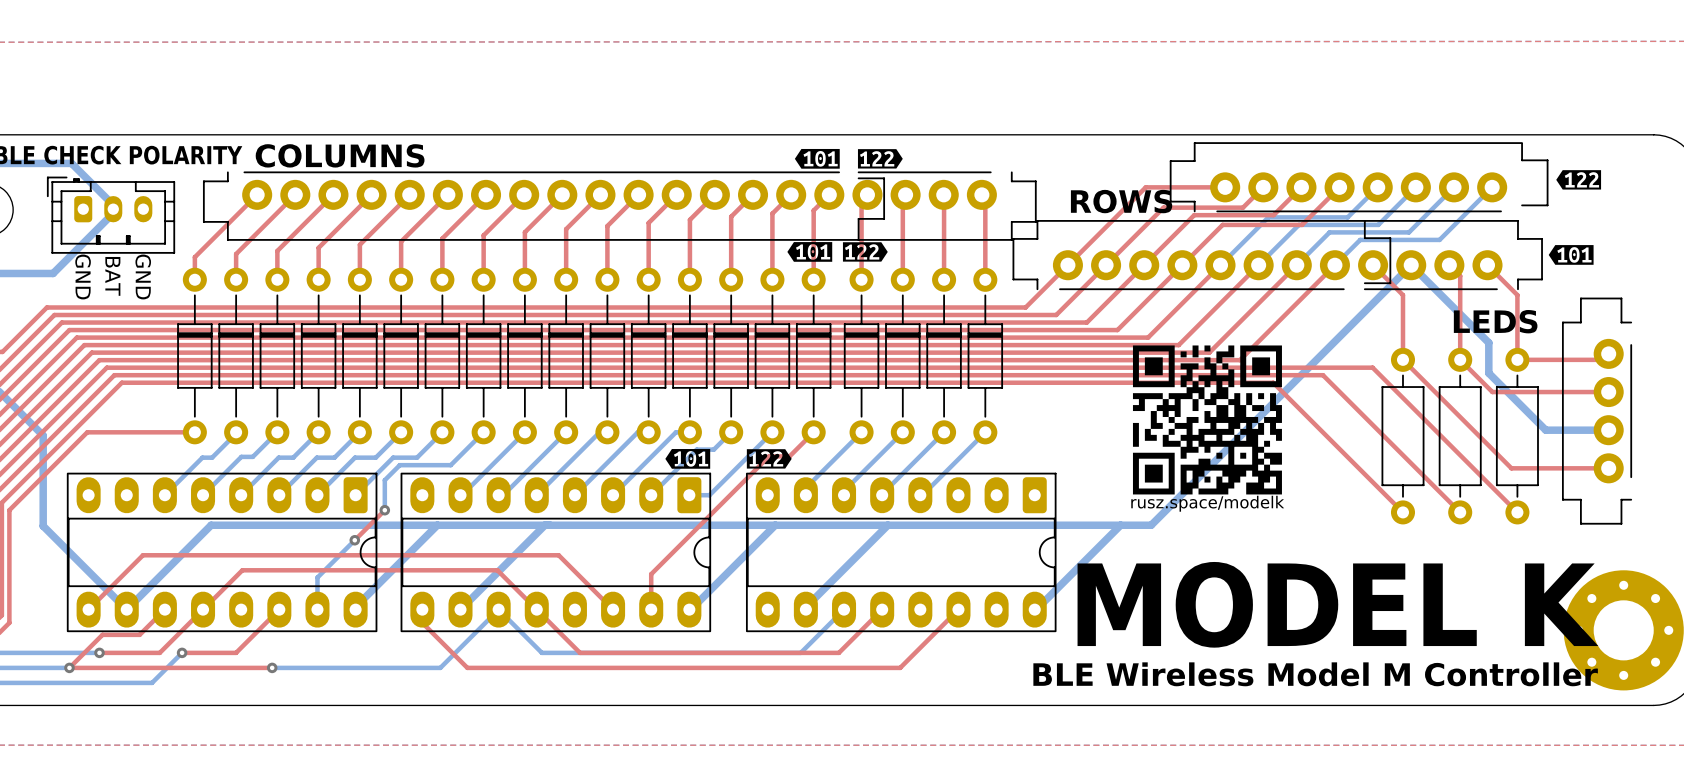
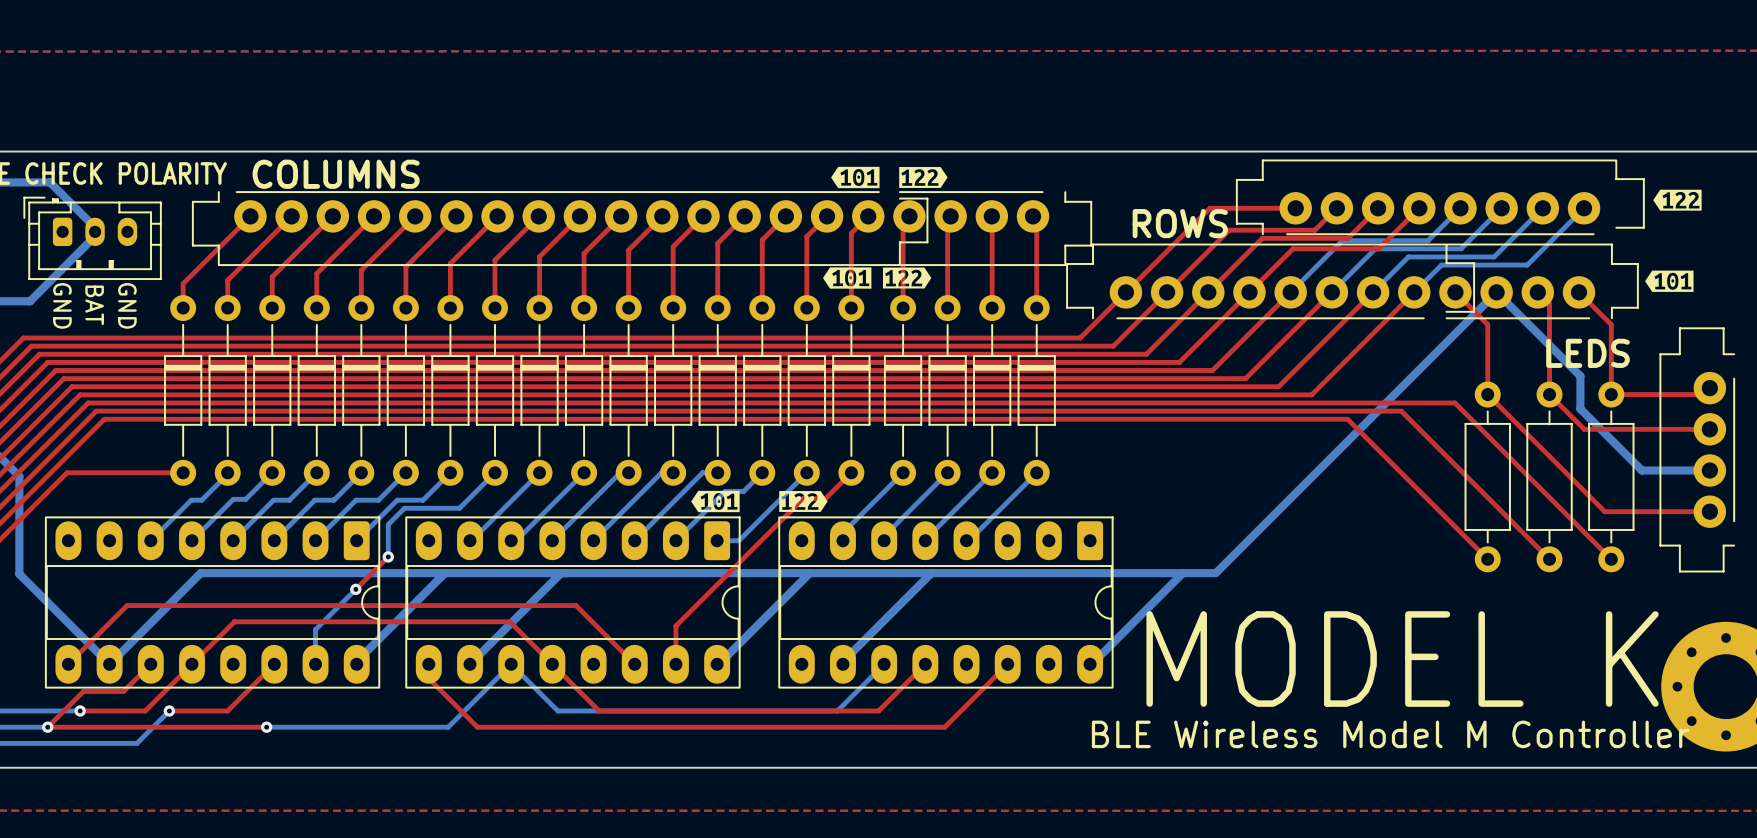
drawing: [1132, 345, 1282, 495] -> none
text: rusz.space/modelk (1207, 503) -> none

